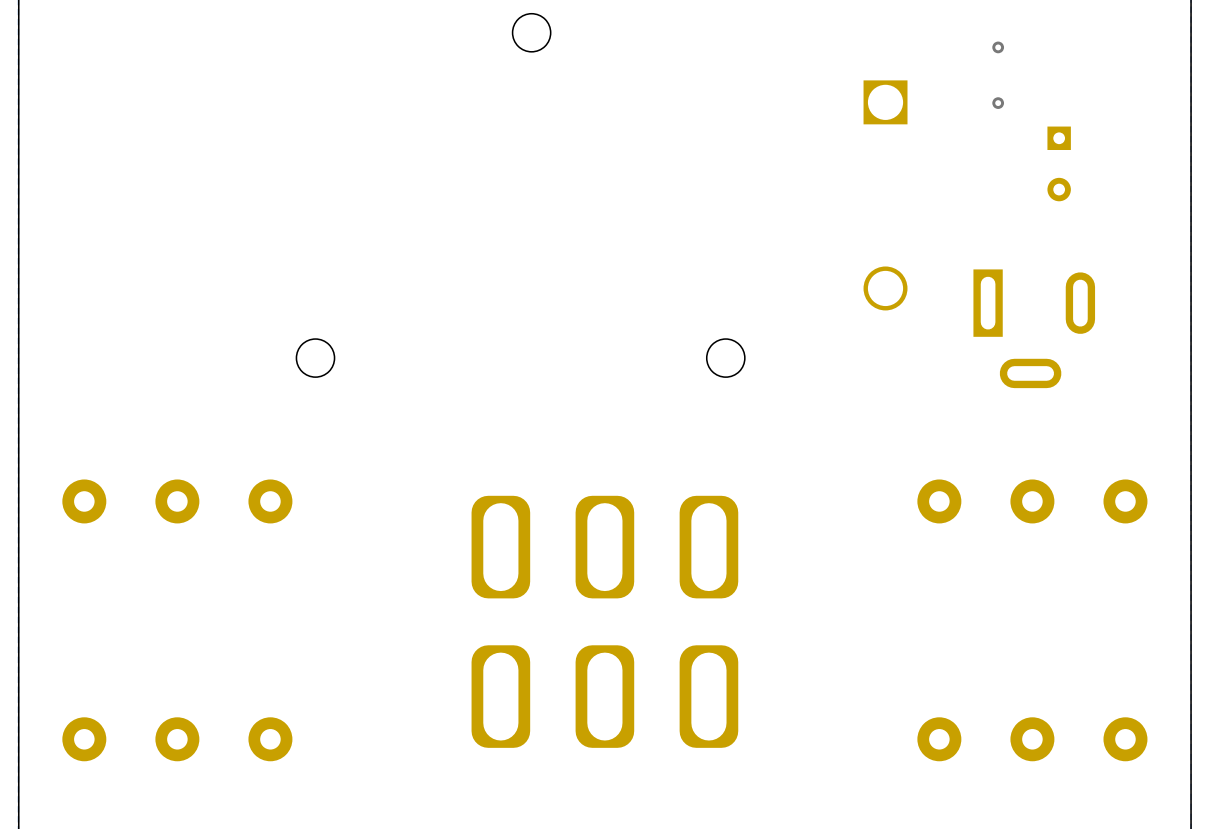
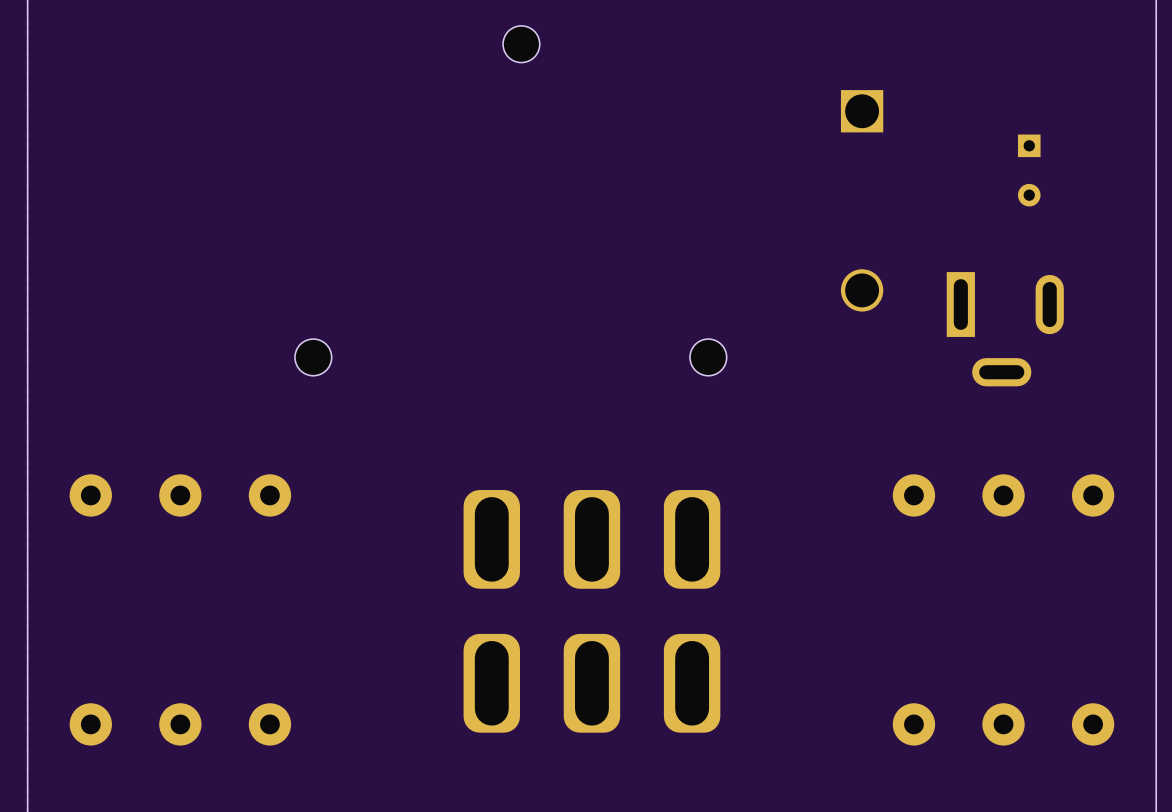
via: (998, 47) -> none
via: (998, 103) -> none

